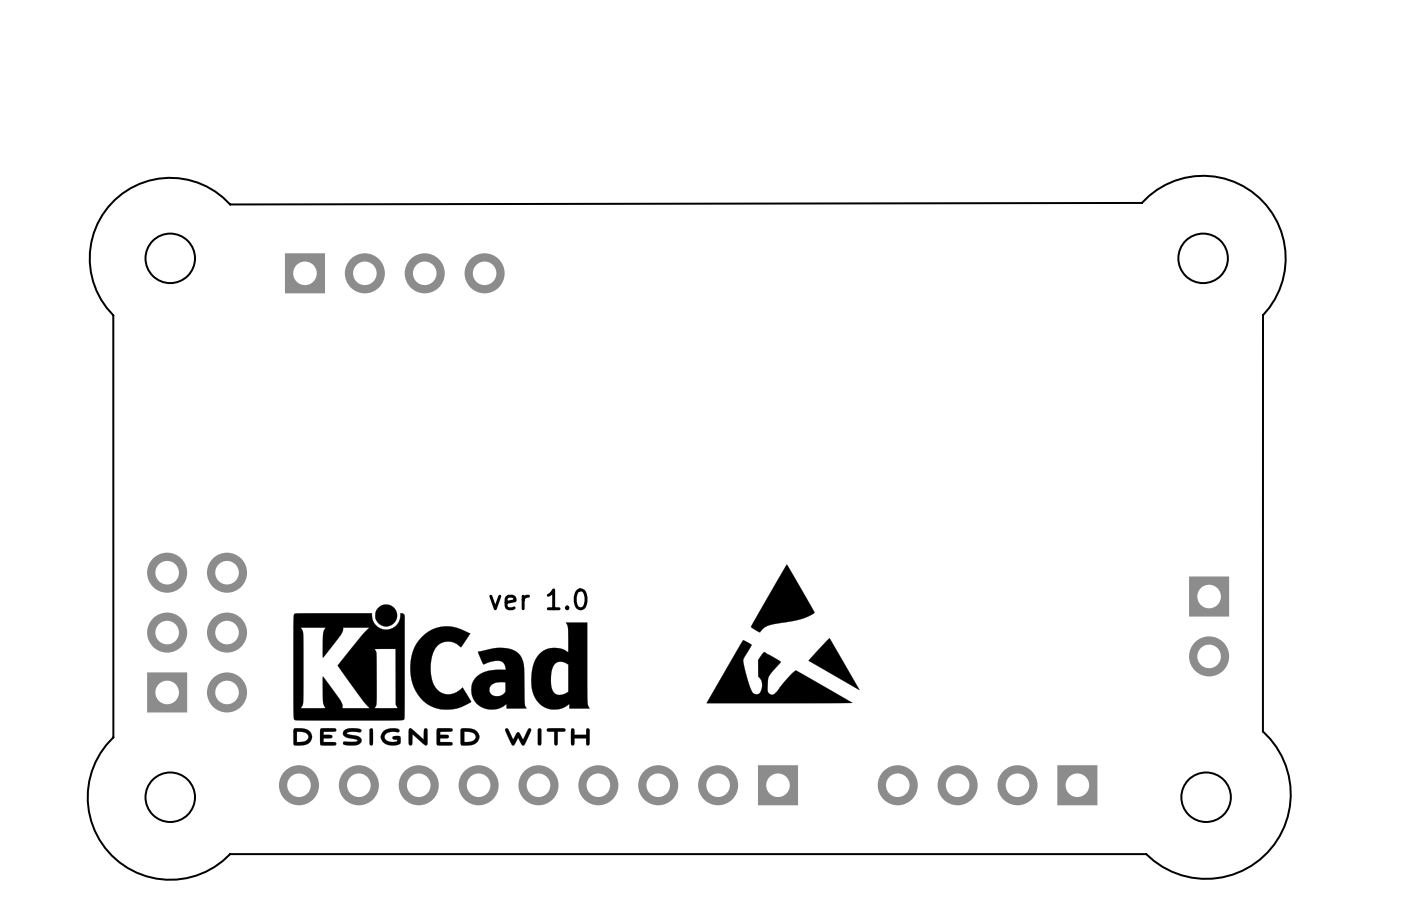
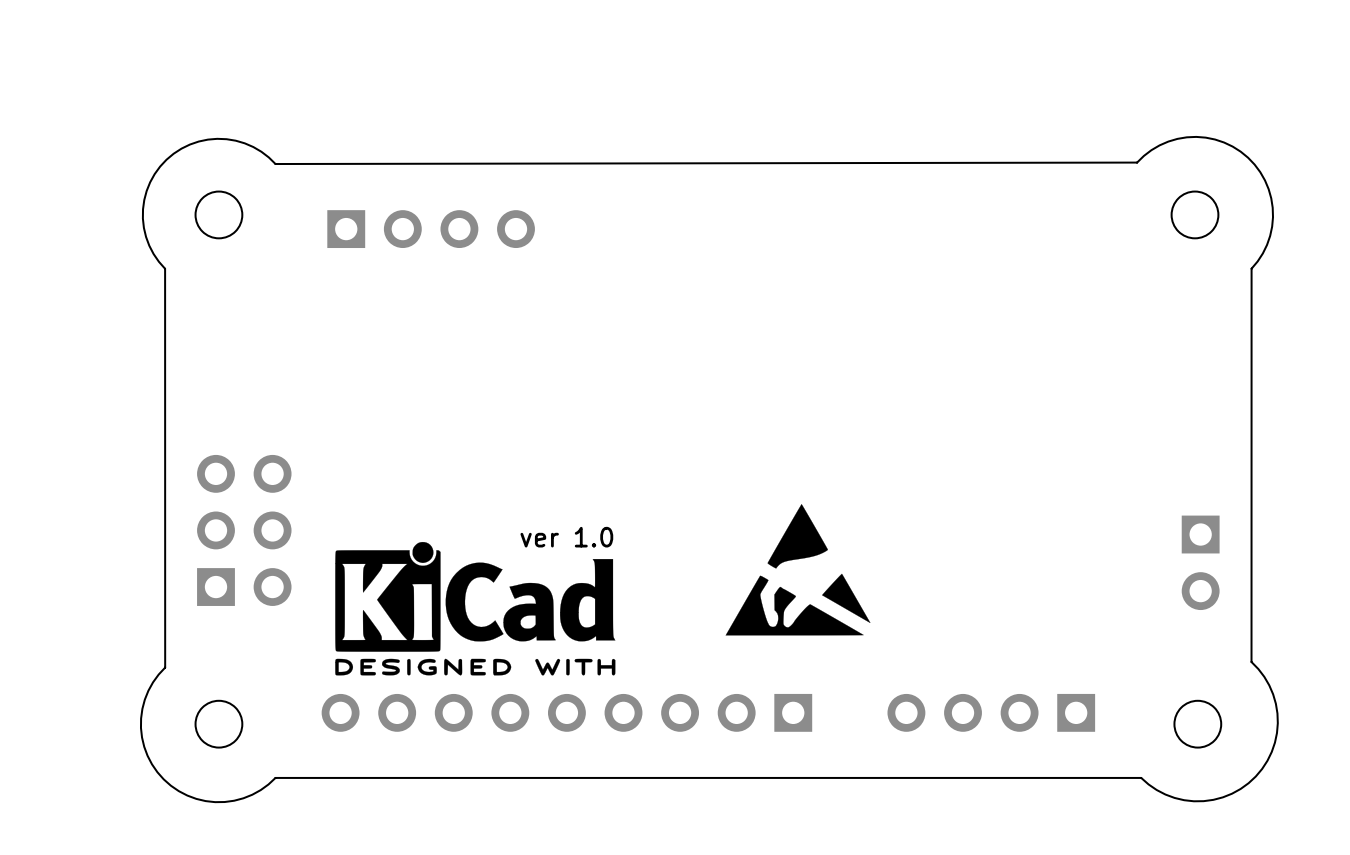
part position: (197, 632) -> (244, 530)

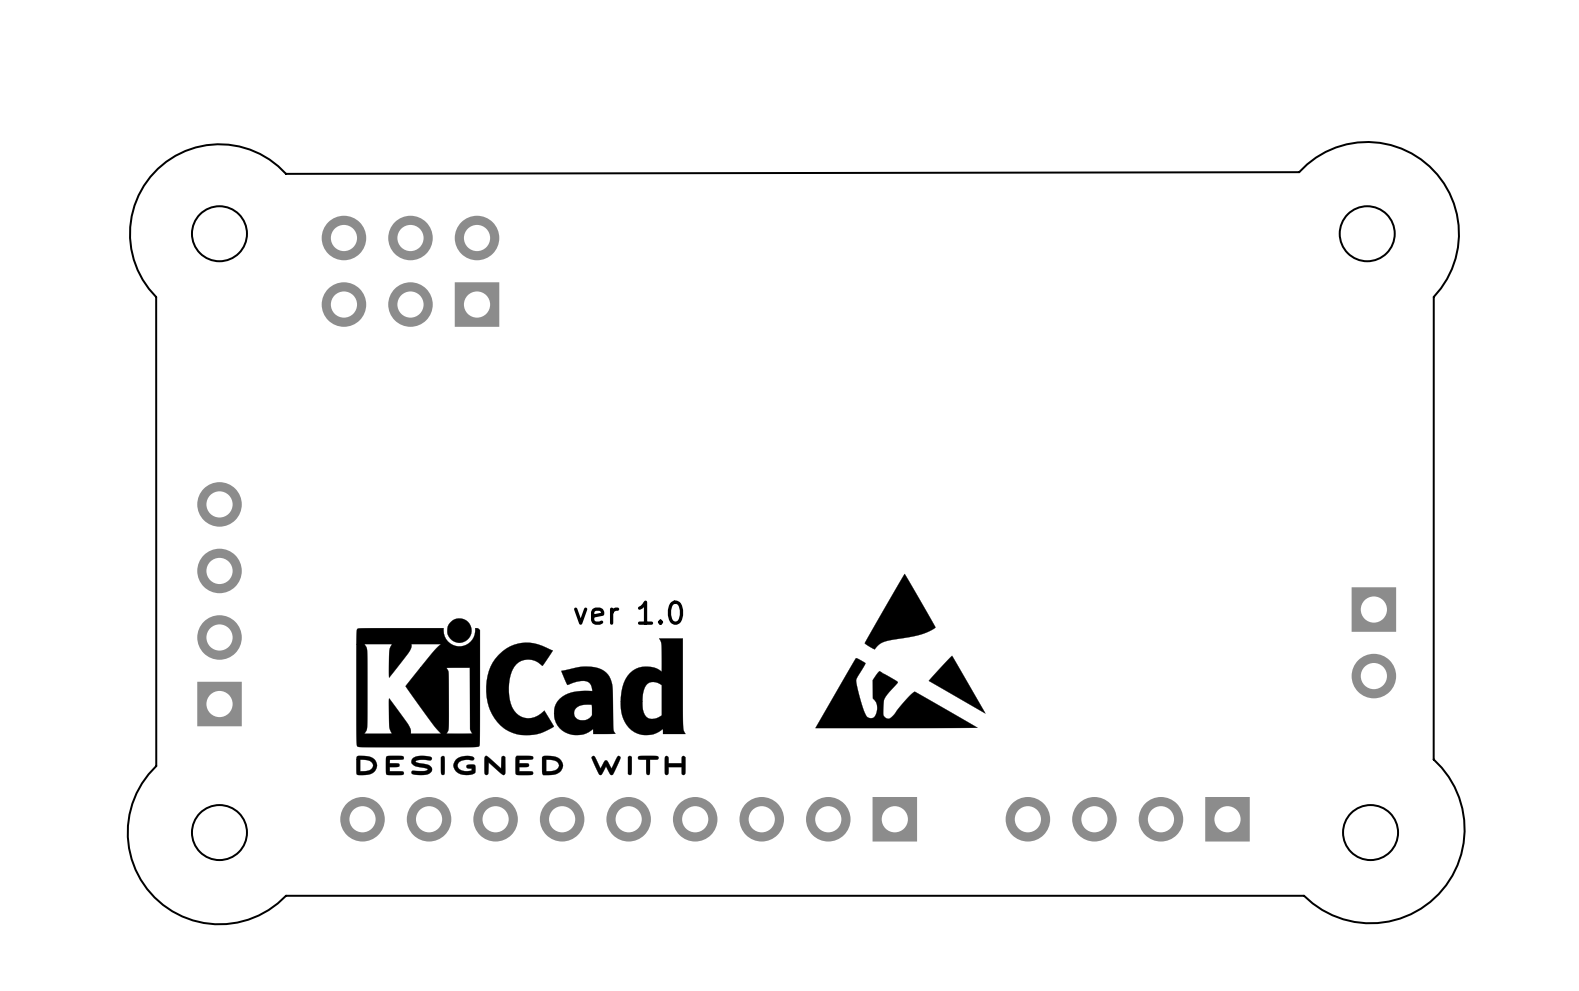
part rotation: 0° (431, 229) -> 90° counterclockwise (219, 604)
part position: (431, 229) -> (219, 604)
part rotation: 0° (244, 530) -> 90° counterclockwise (410, 271)
part position: (244, 530) -> (410, 271)

